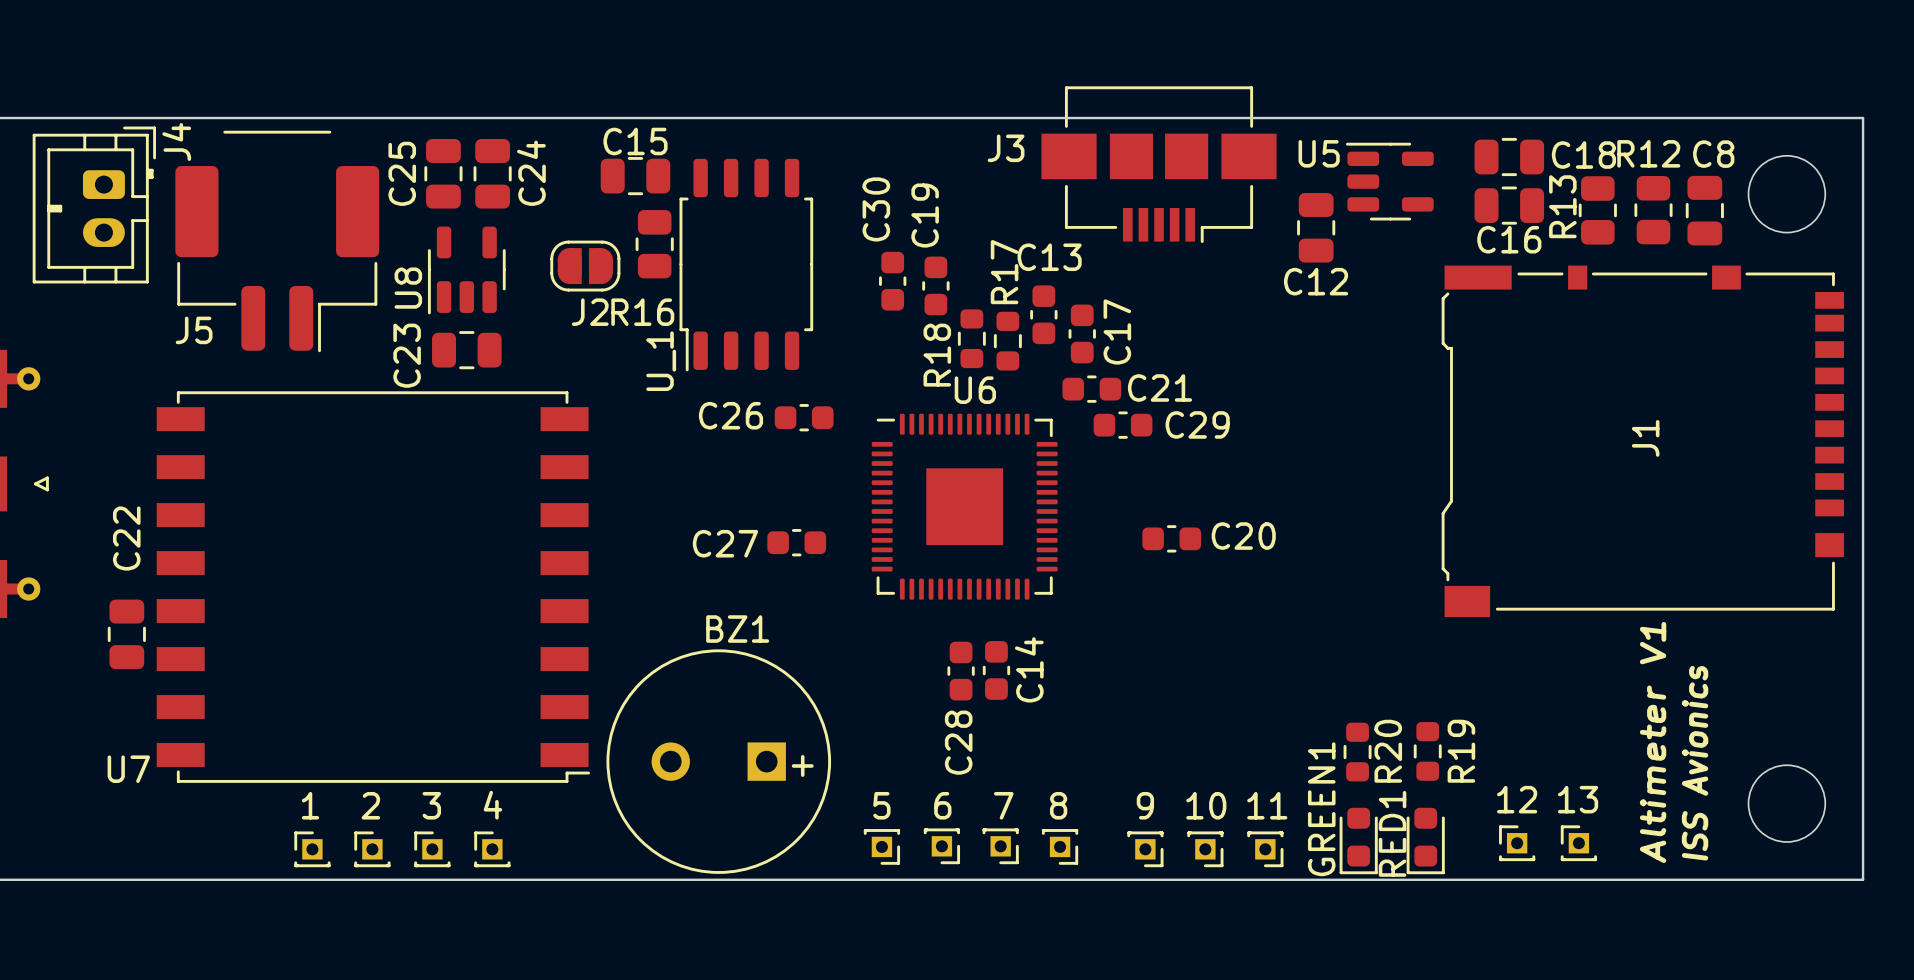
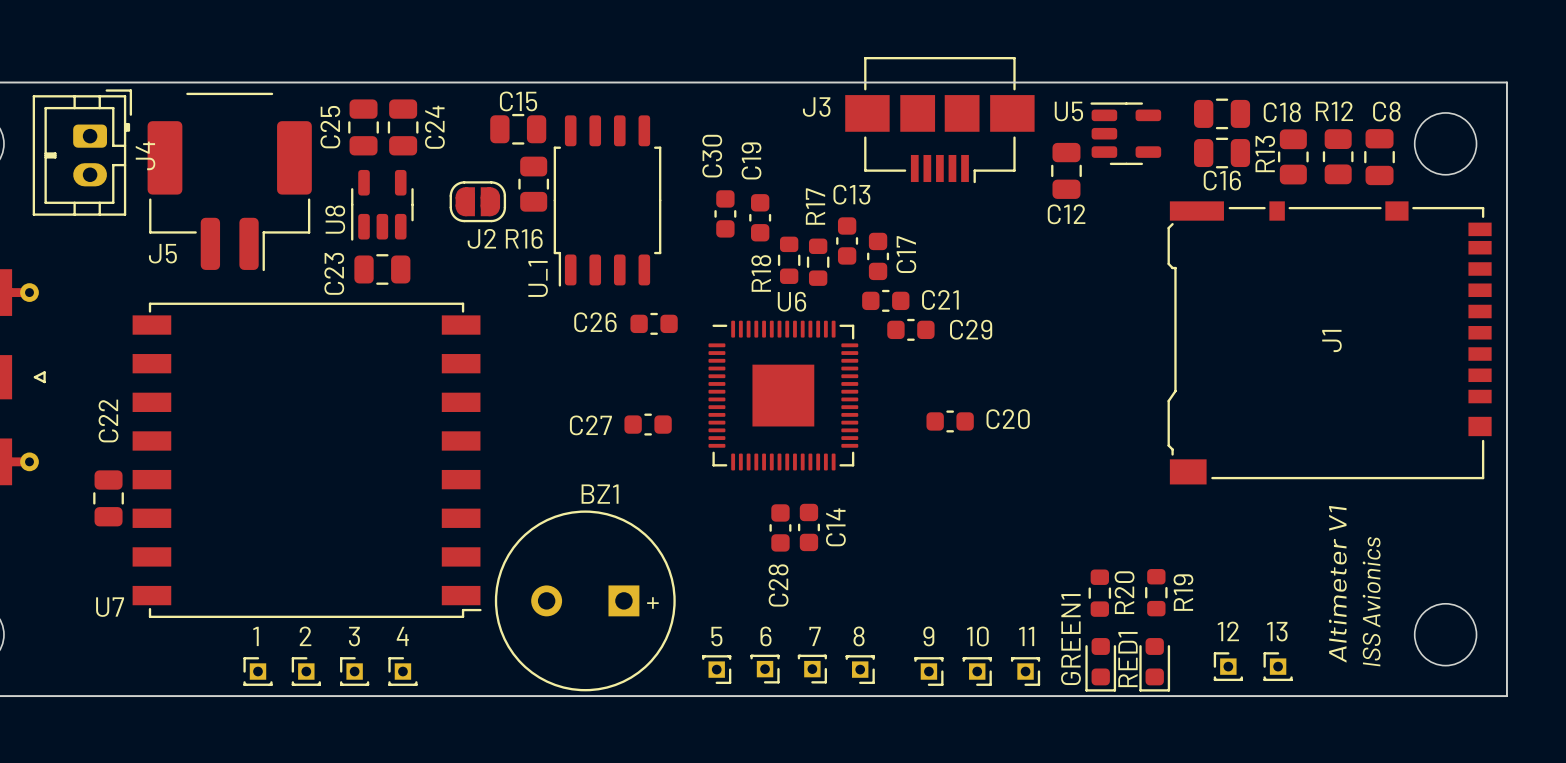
J4 name position: J4 (176, 142) -> J4 (145, 155)

